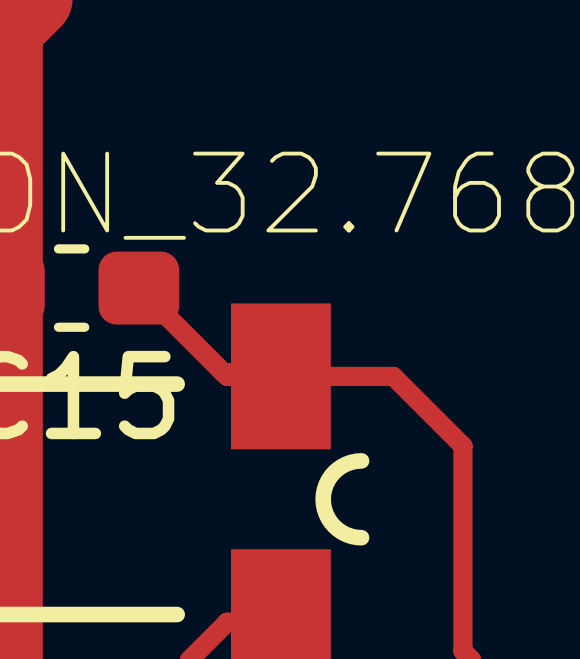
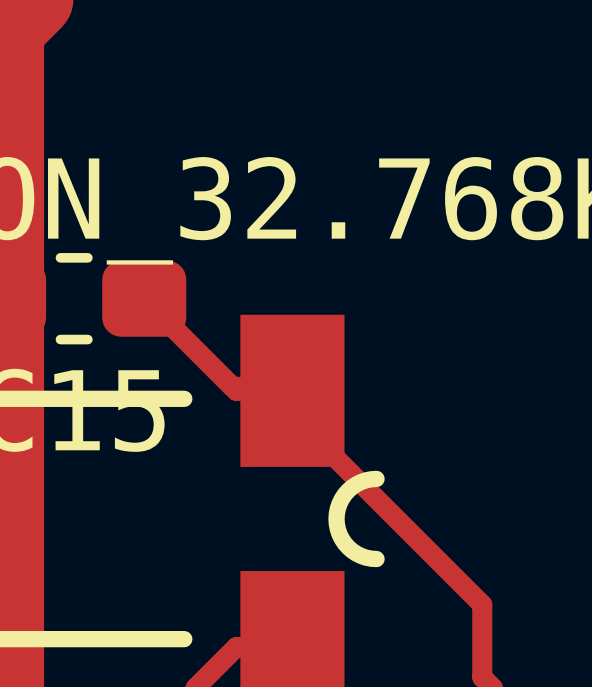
top track: (280, 376) (393, 376) (462, 445) (462, 581) -> (292, 390) (292, 414) (482, 604)

